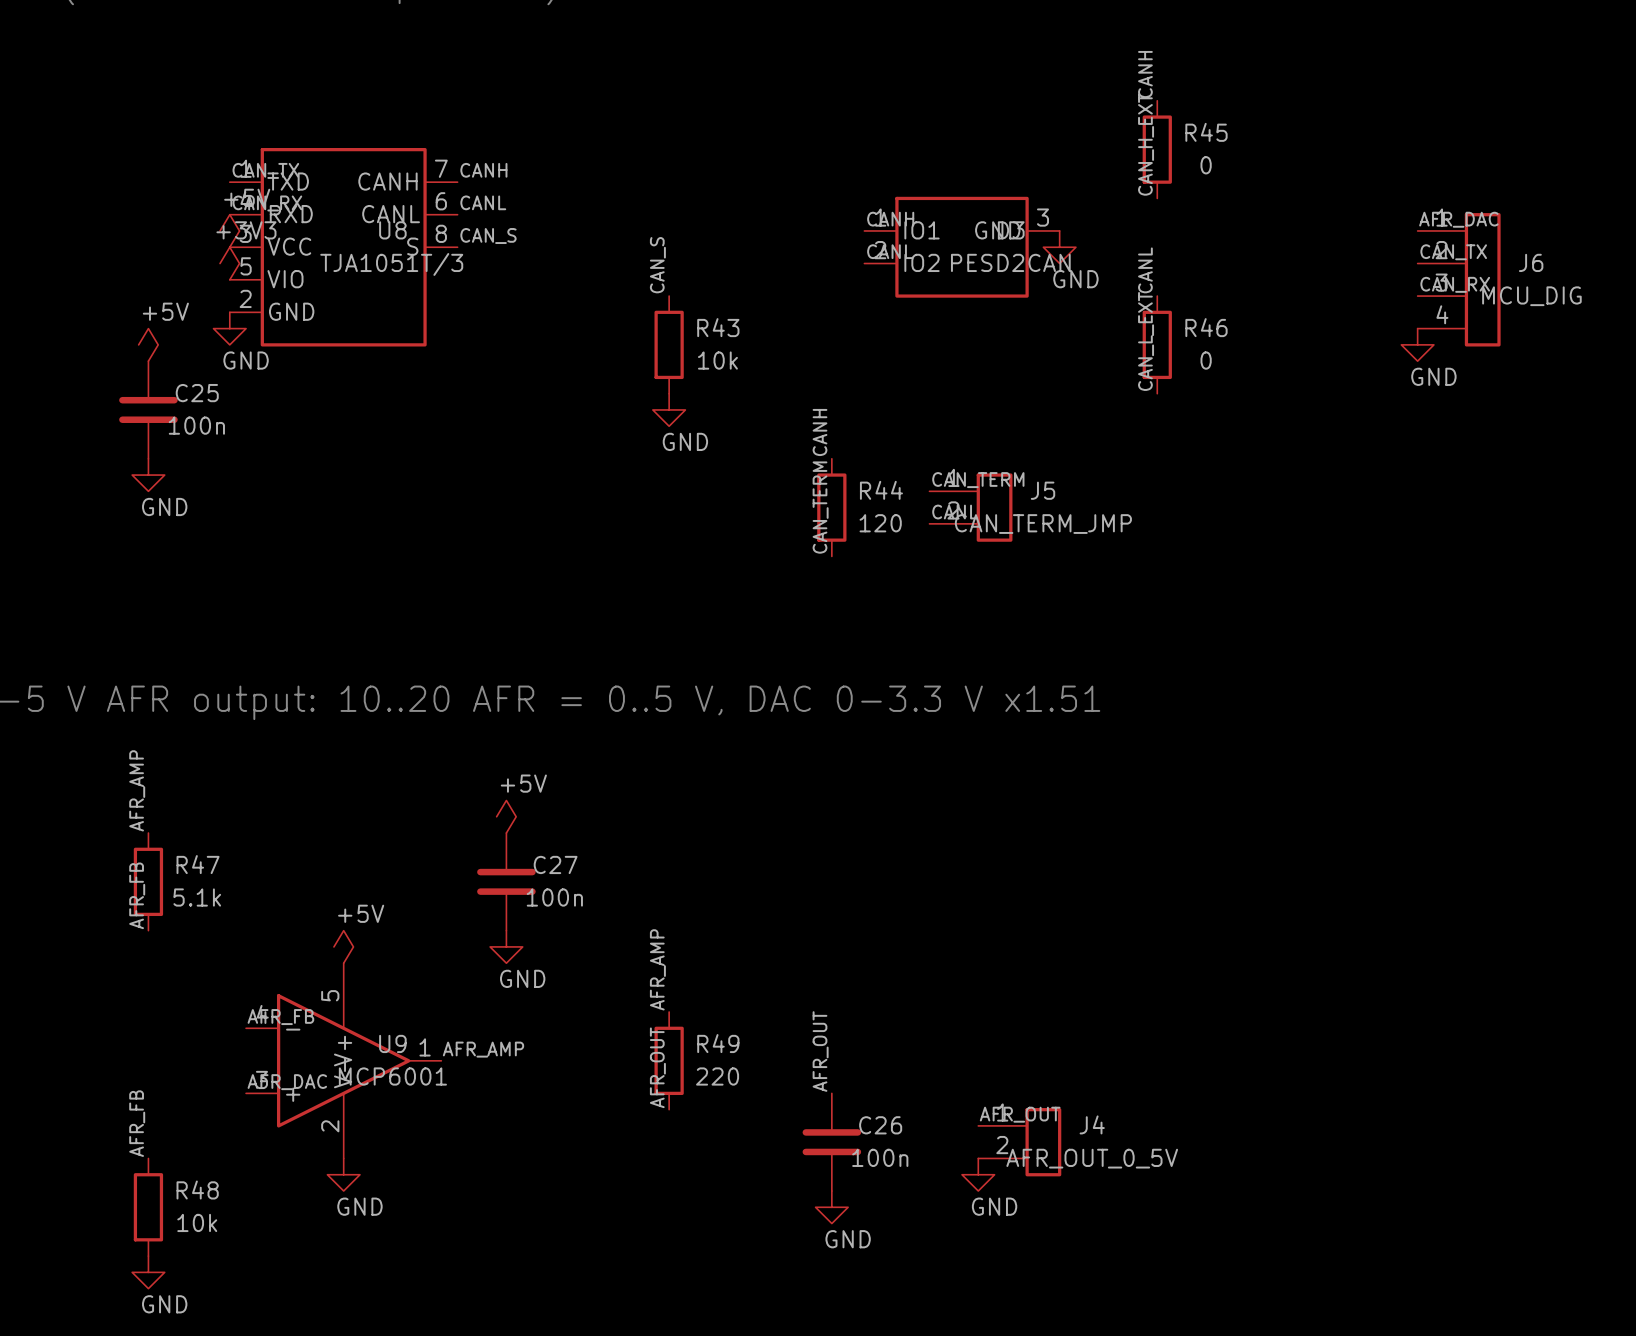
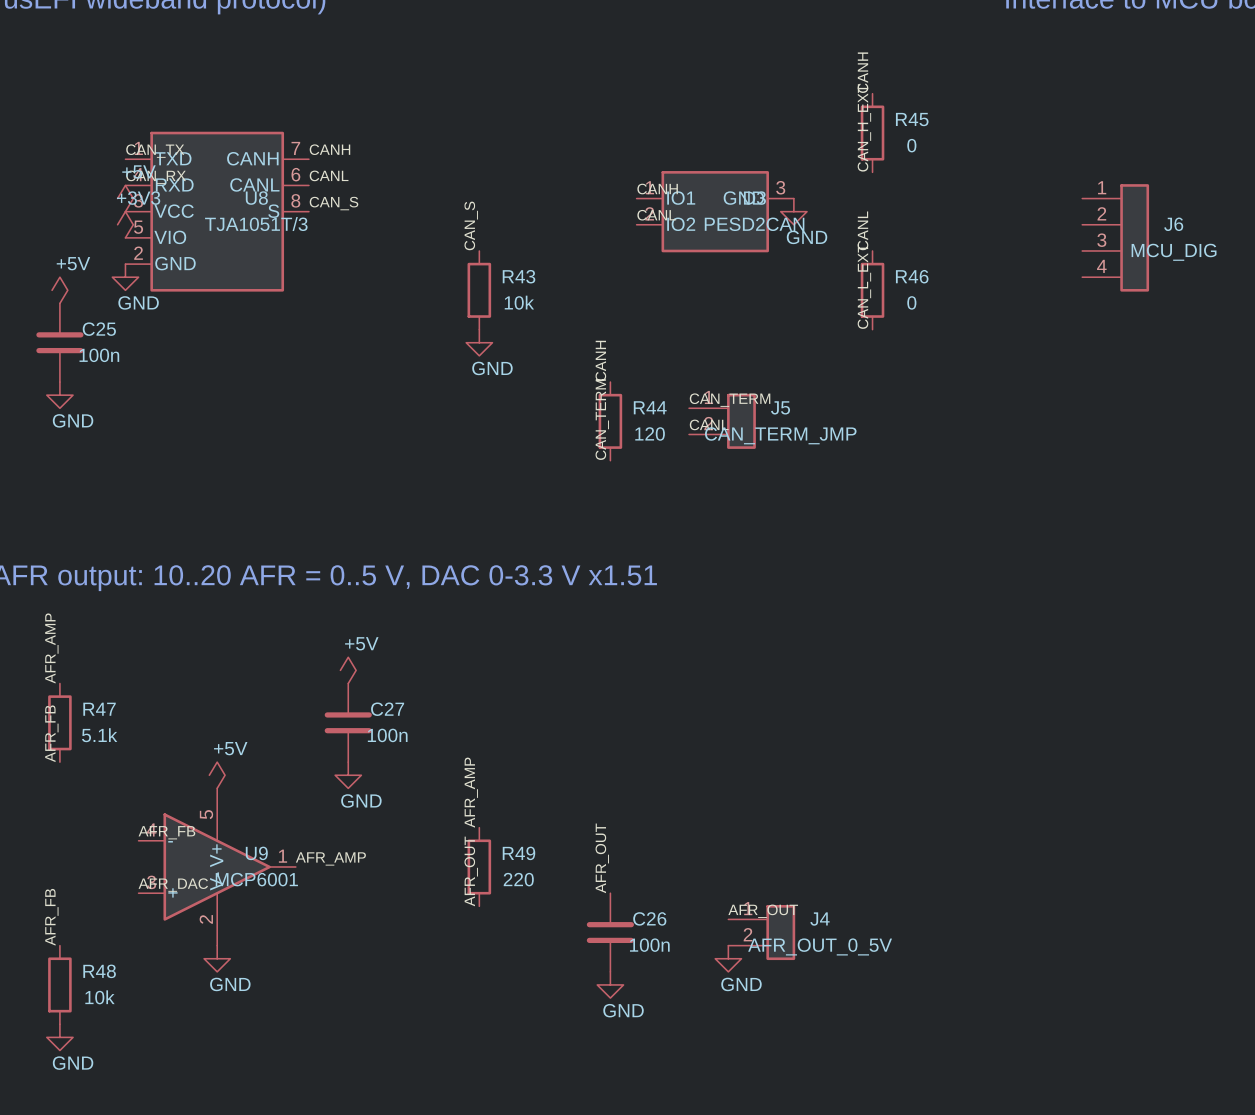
label: AFR_DAC (1458, 219) -> none
label: CAN_TX (1453, 252) -> none
label: CAN_RX (1455, 284) -> none
power symbol: GND (1417, 344) -> none

